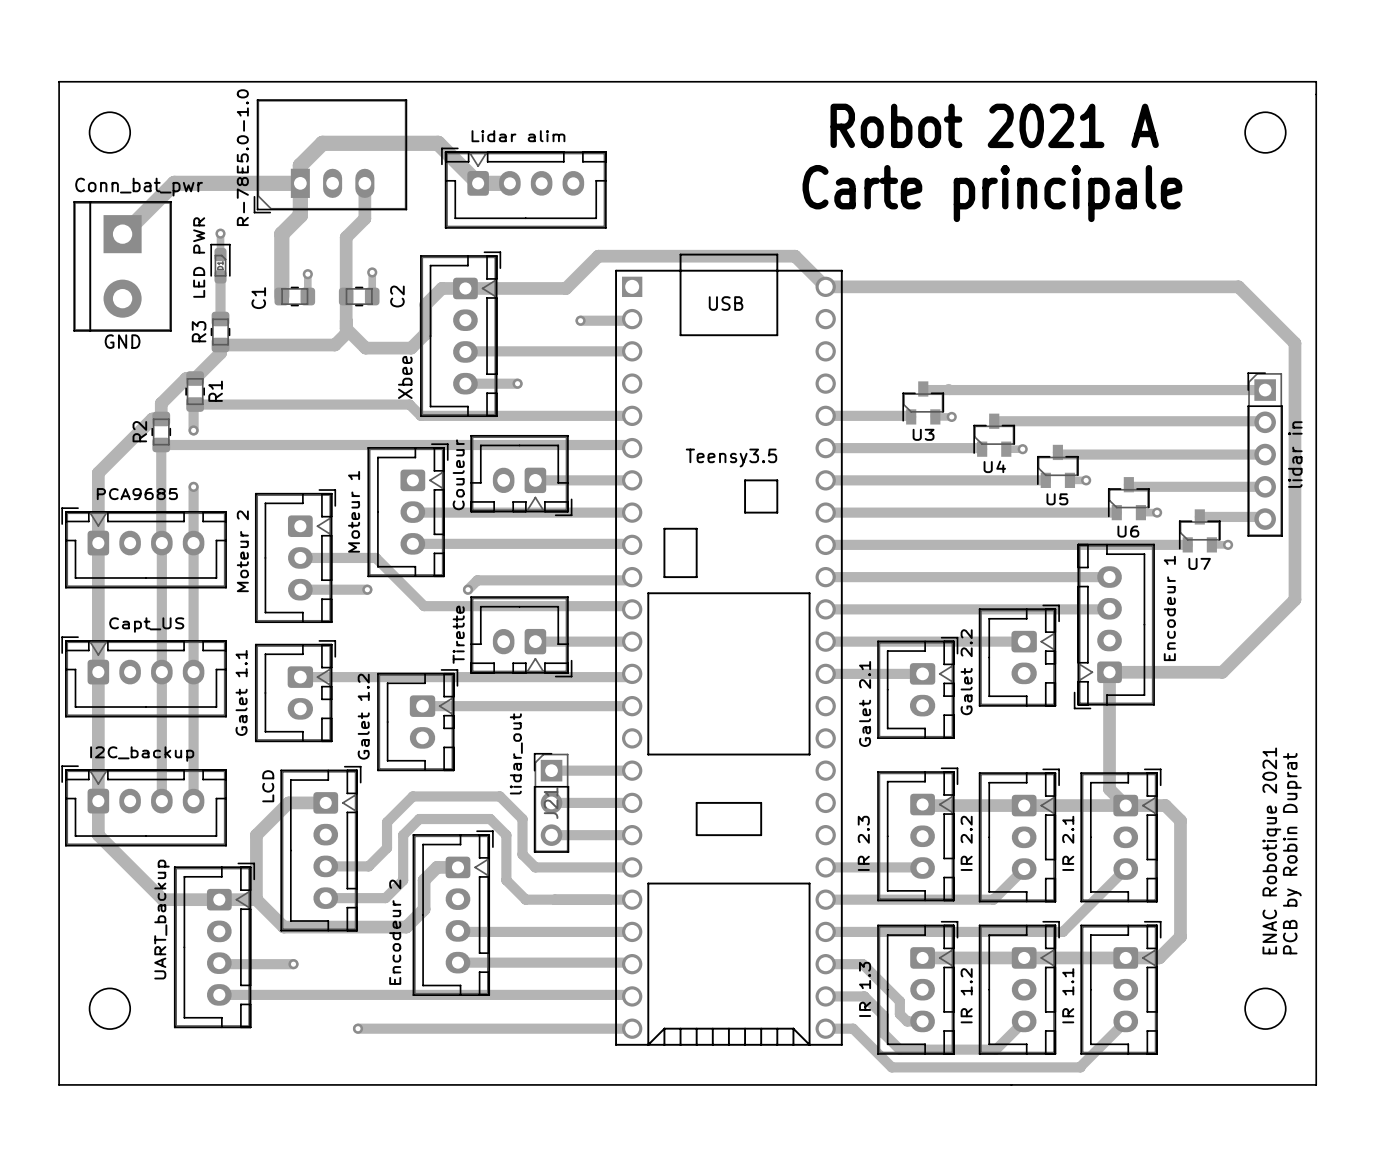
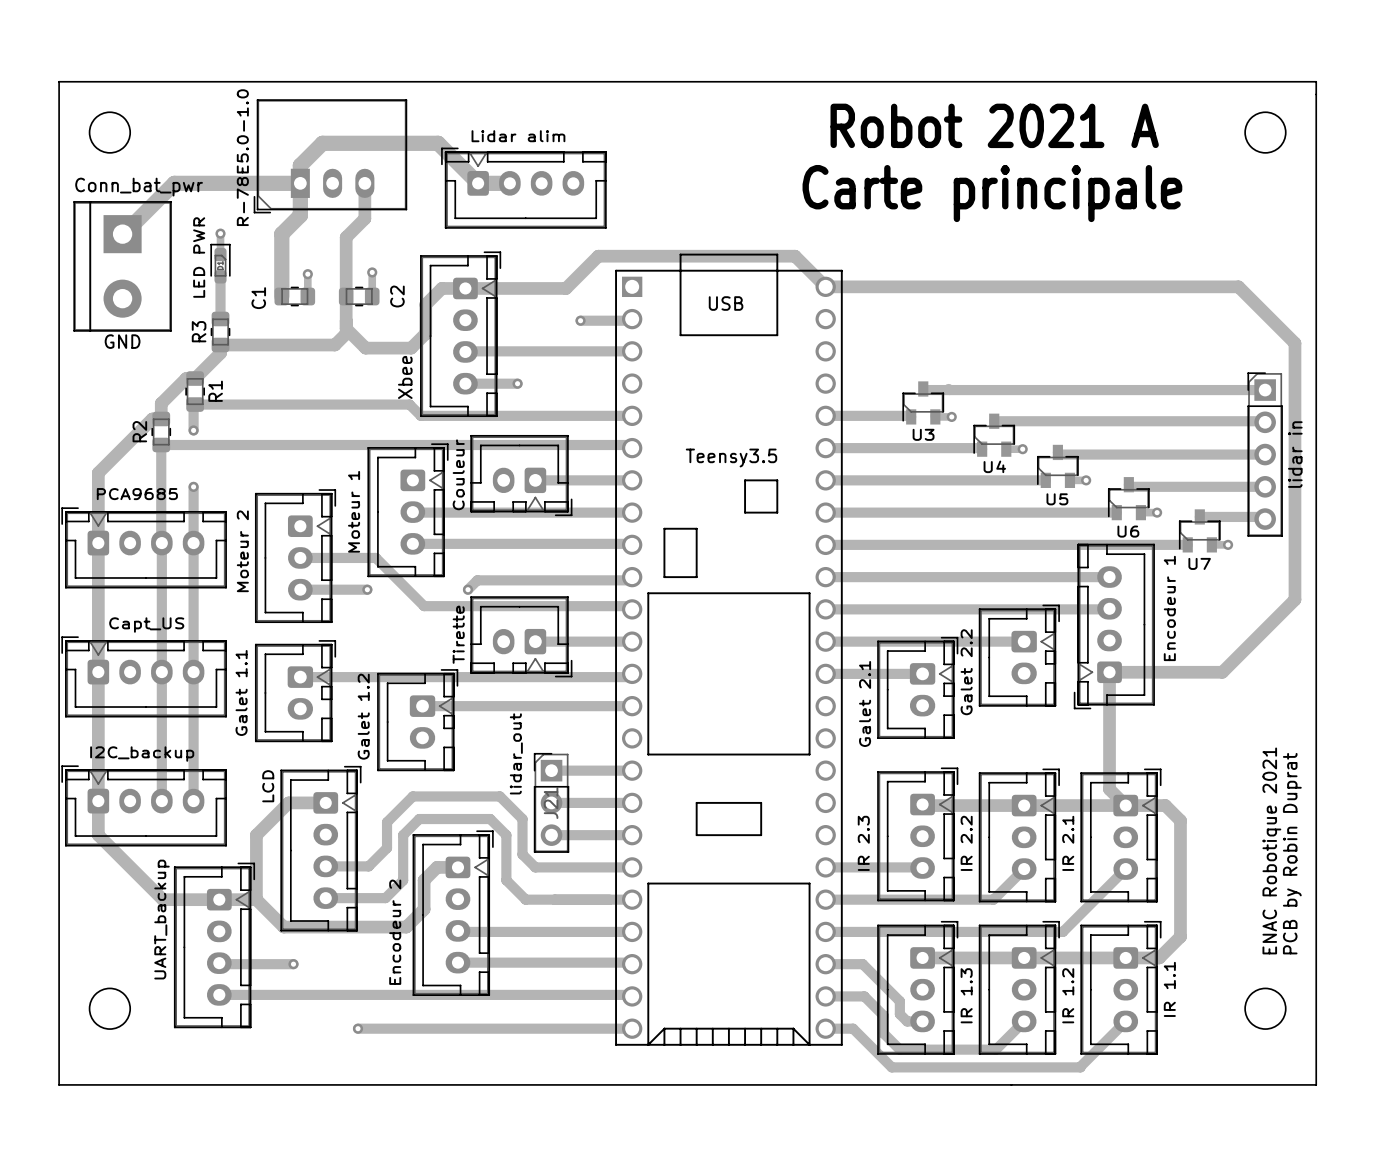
part value position: IR 1.3 (865, 989) -> IR 1.3 (966, 995)
part value position: IR 1.2 (966, 995) -> IR 1.2 (1068, 995)
part value position: IR 1.1 (1068, 995) -> IR 1.1 (1169, 989)

